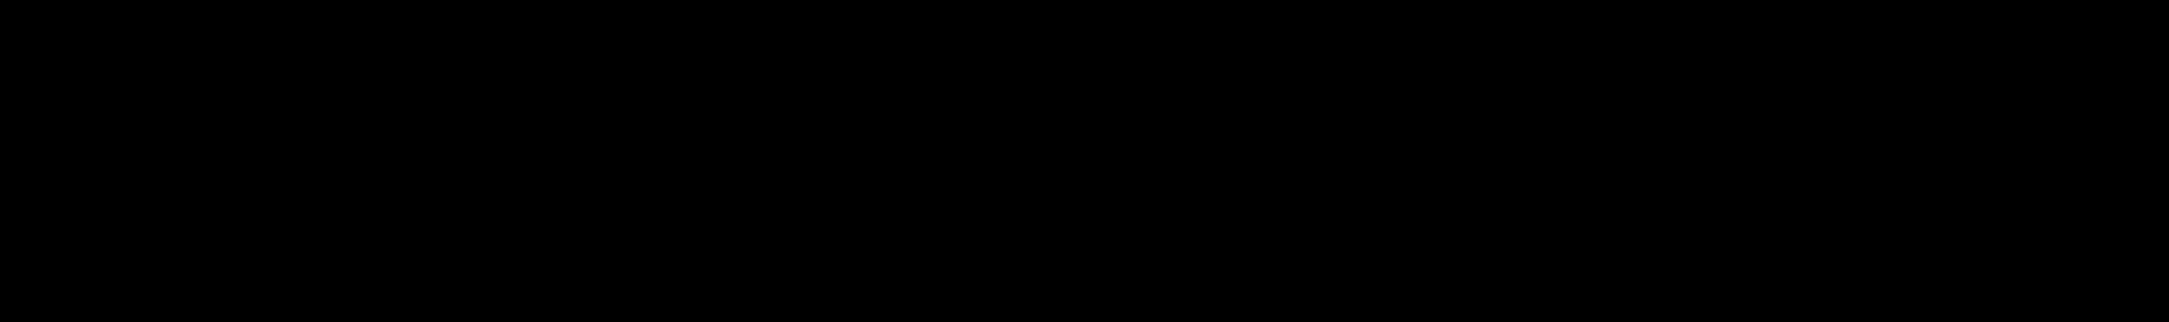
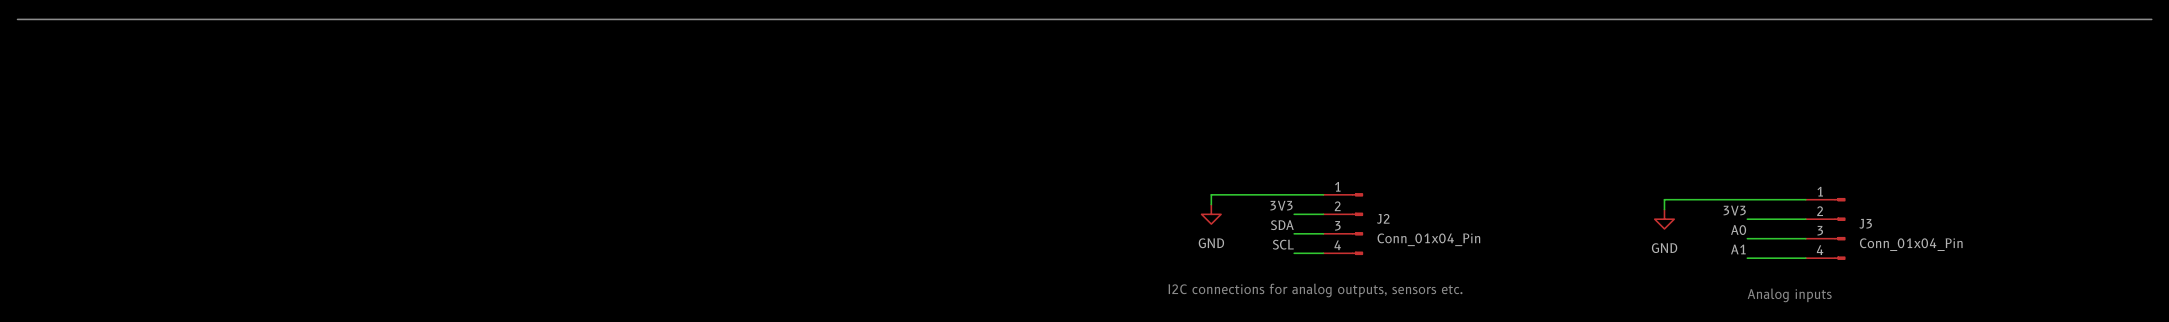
line: none -> (17, 19) (2151, 19)
wire: none -> (1323, 194) (1211, 194) (1211, 204)
wire: none -> (1805, 199) (1664, 199) (1664, 209)
label: none -> 3V3 (1281, 205)
label: none -> 3V3 (1734, 210)
power symbol: none -> GND (1211, 214)
wire: none -> (1294, 214) (1323, 214)
power symbol: none -> GND (1664, 219)
wire: none -> (1747, 219) (1805, 219)
J2: none -> Conn_01x04_Pin (1343, 224)
label: none -> SDA (1282, 225)
J3: none -> Conn_01x04_Pin (1825, 228)
label: none -> A0 (1738, 230)
wire: none -> (1294, 233) (1323, 233)
wire: none -> (1747, 238) (1805, 238)
label: none -> SCL (1283, 244)
label: none -> A1 (1738, 249)
wire: none -> (1294, 253) (1323, 253)
wire: none -> (1747, 258) (1805, 258)
text: none -> I2C connections for analog outputs, sensors etc. (1315, 290)
text: none -> Analog inputs (1789, 295)

